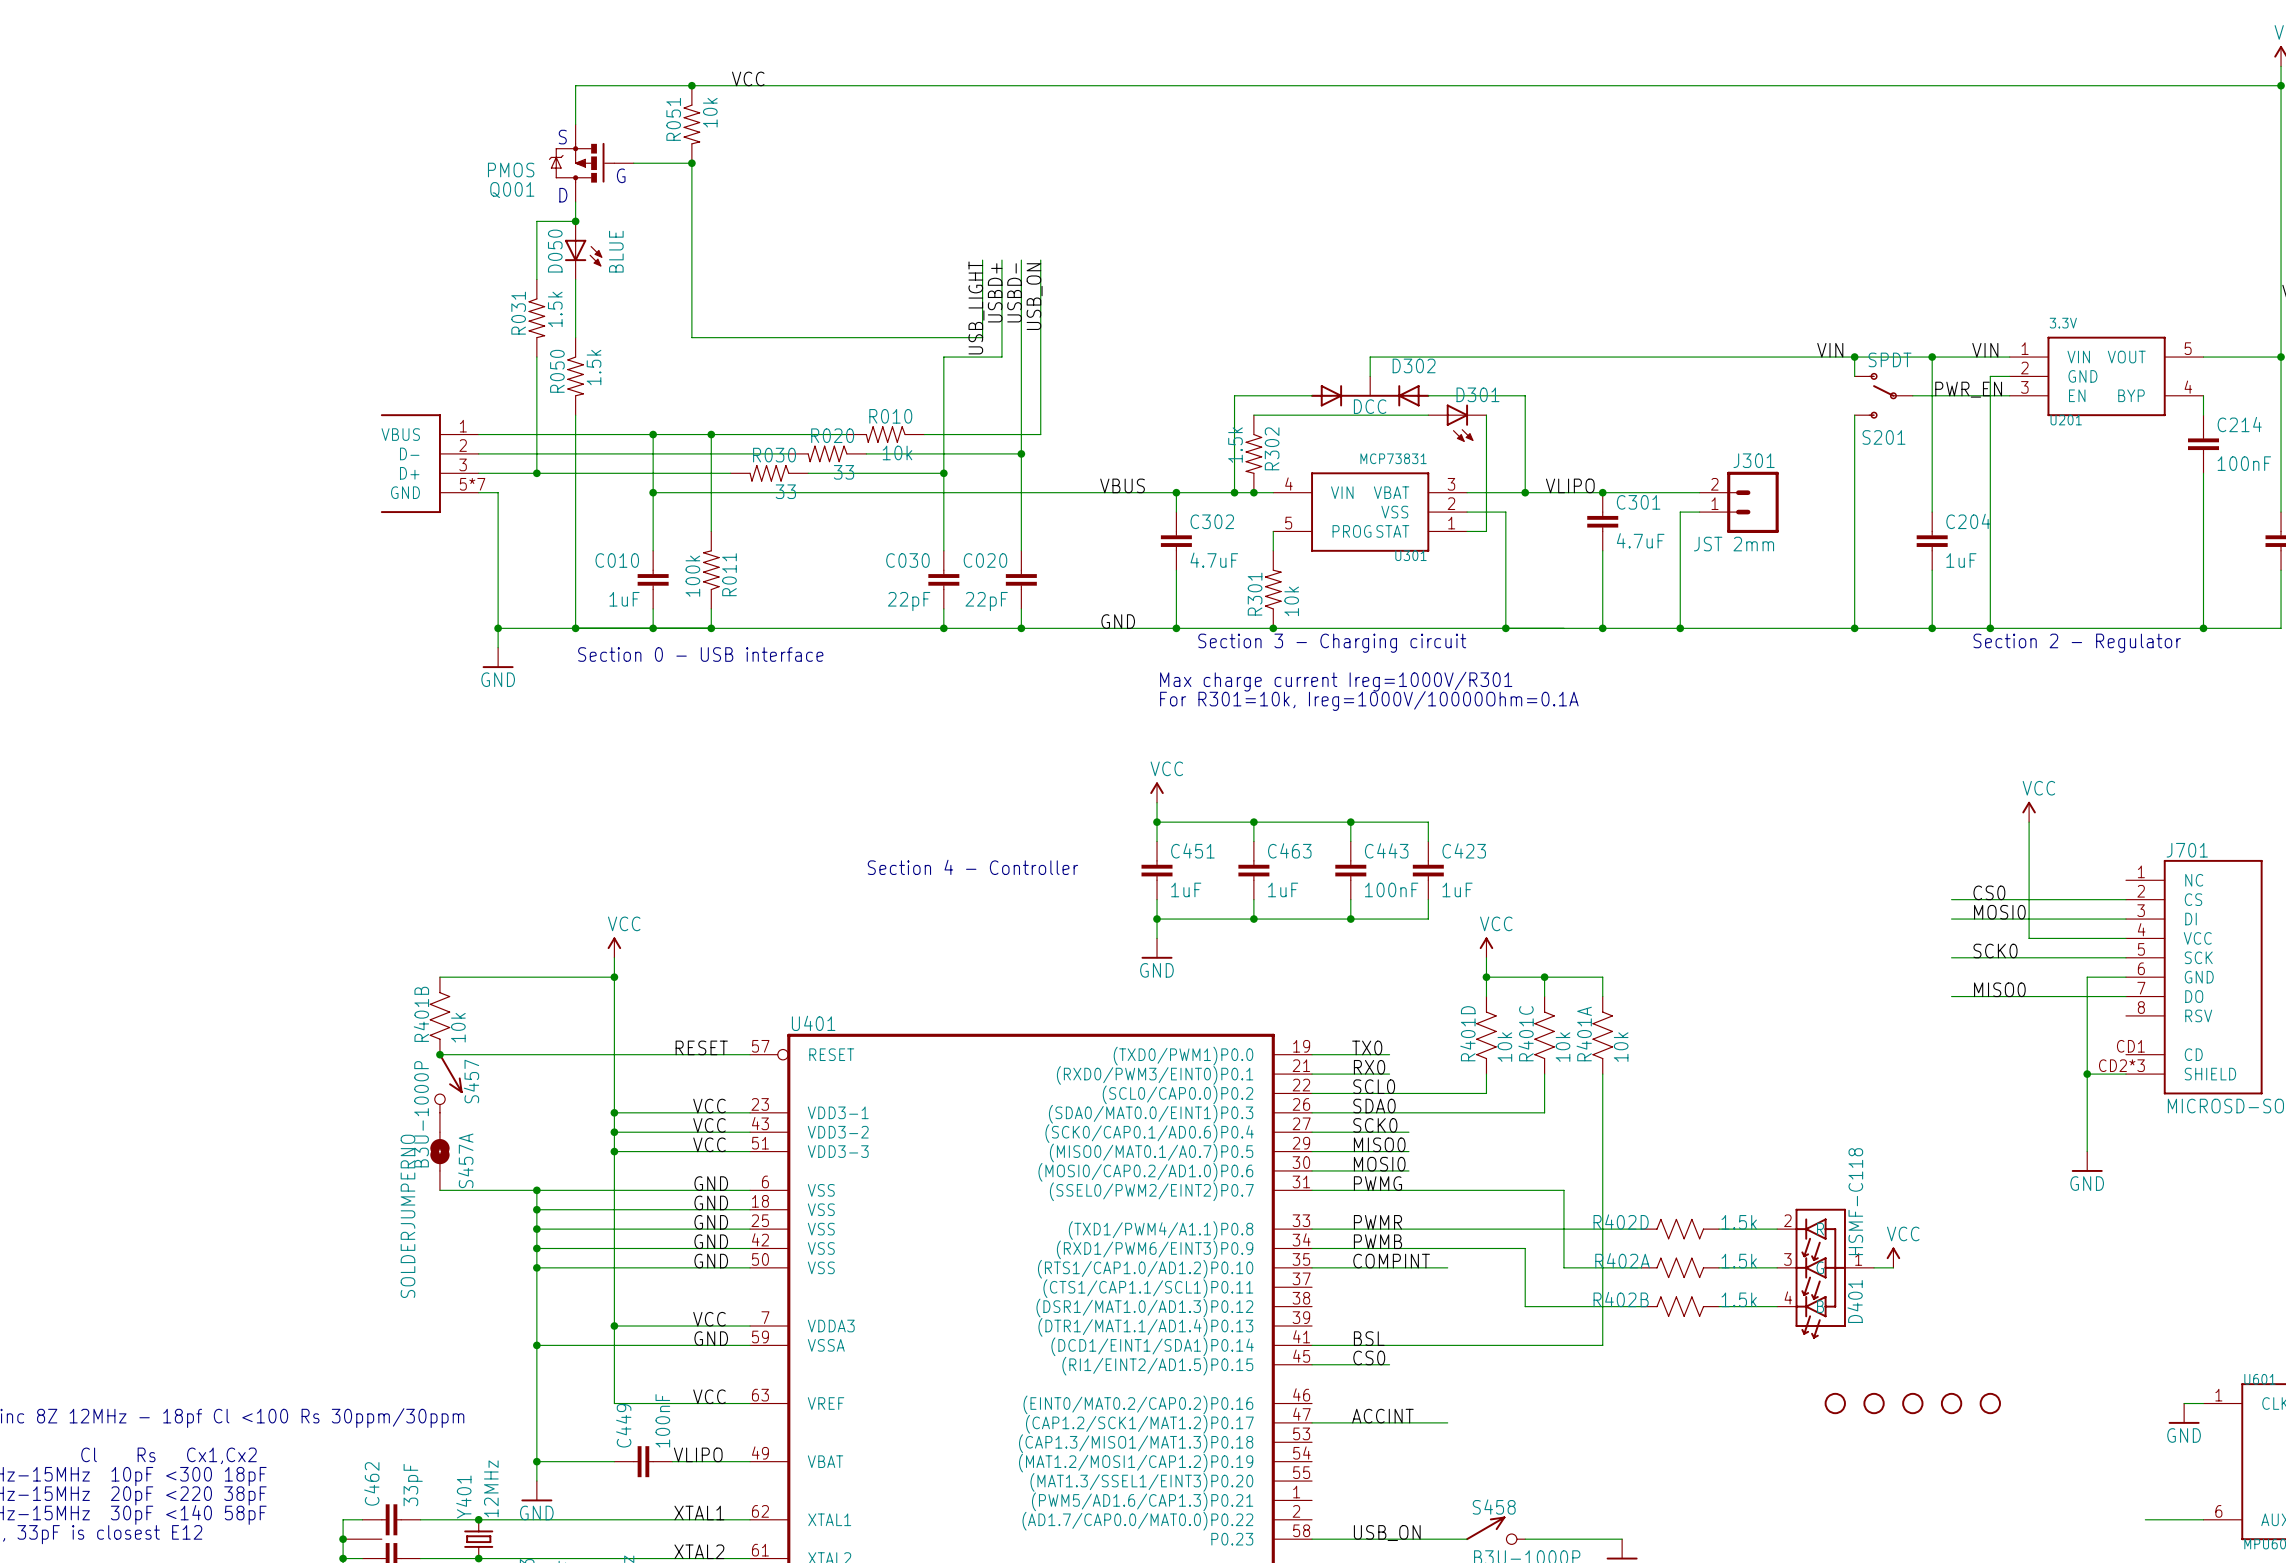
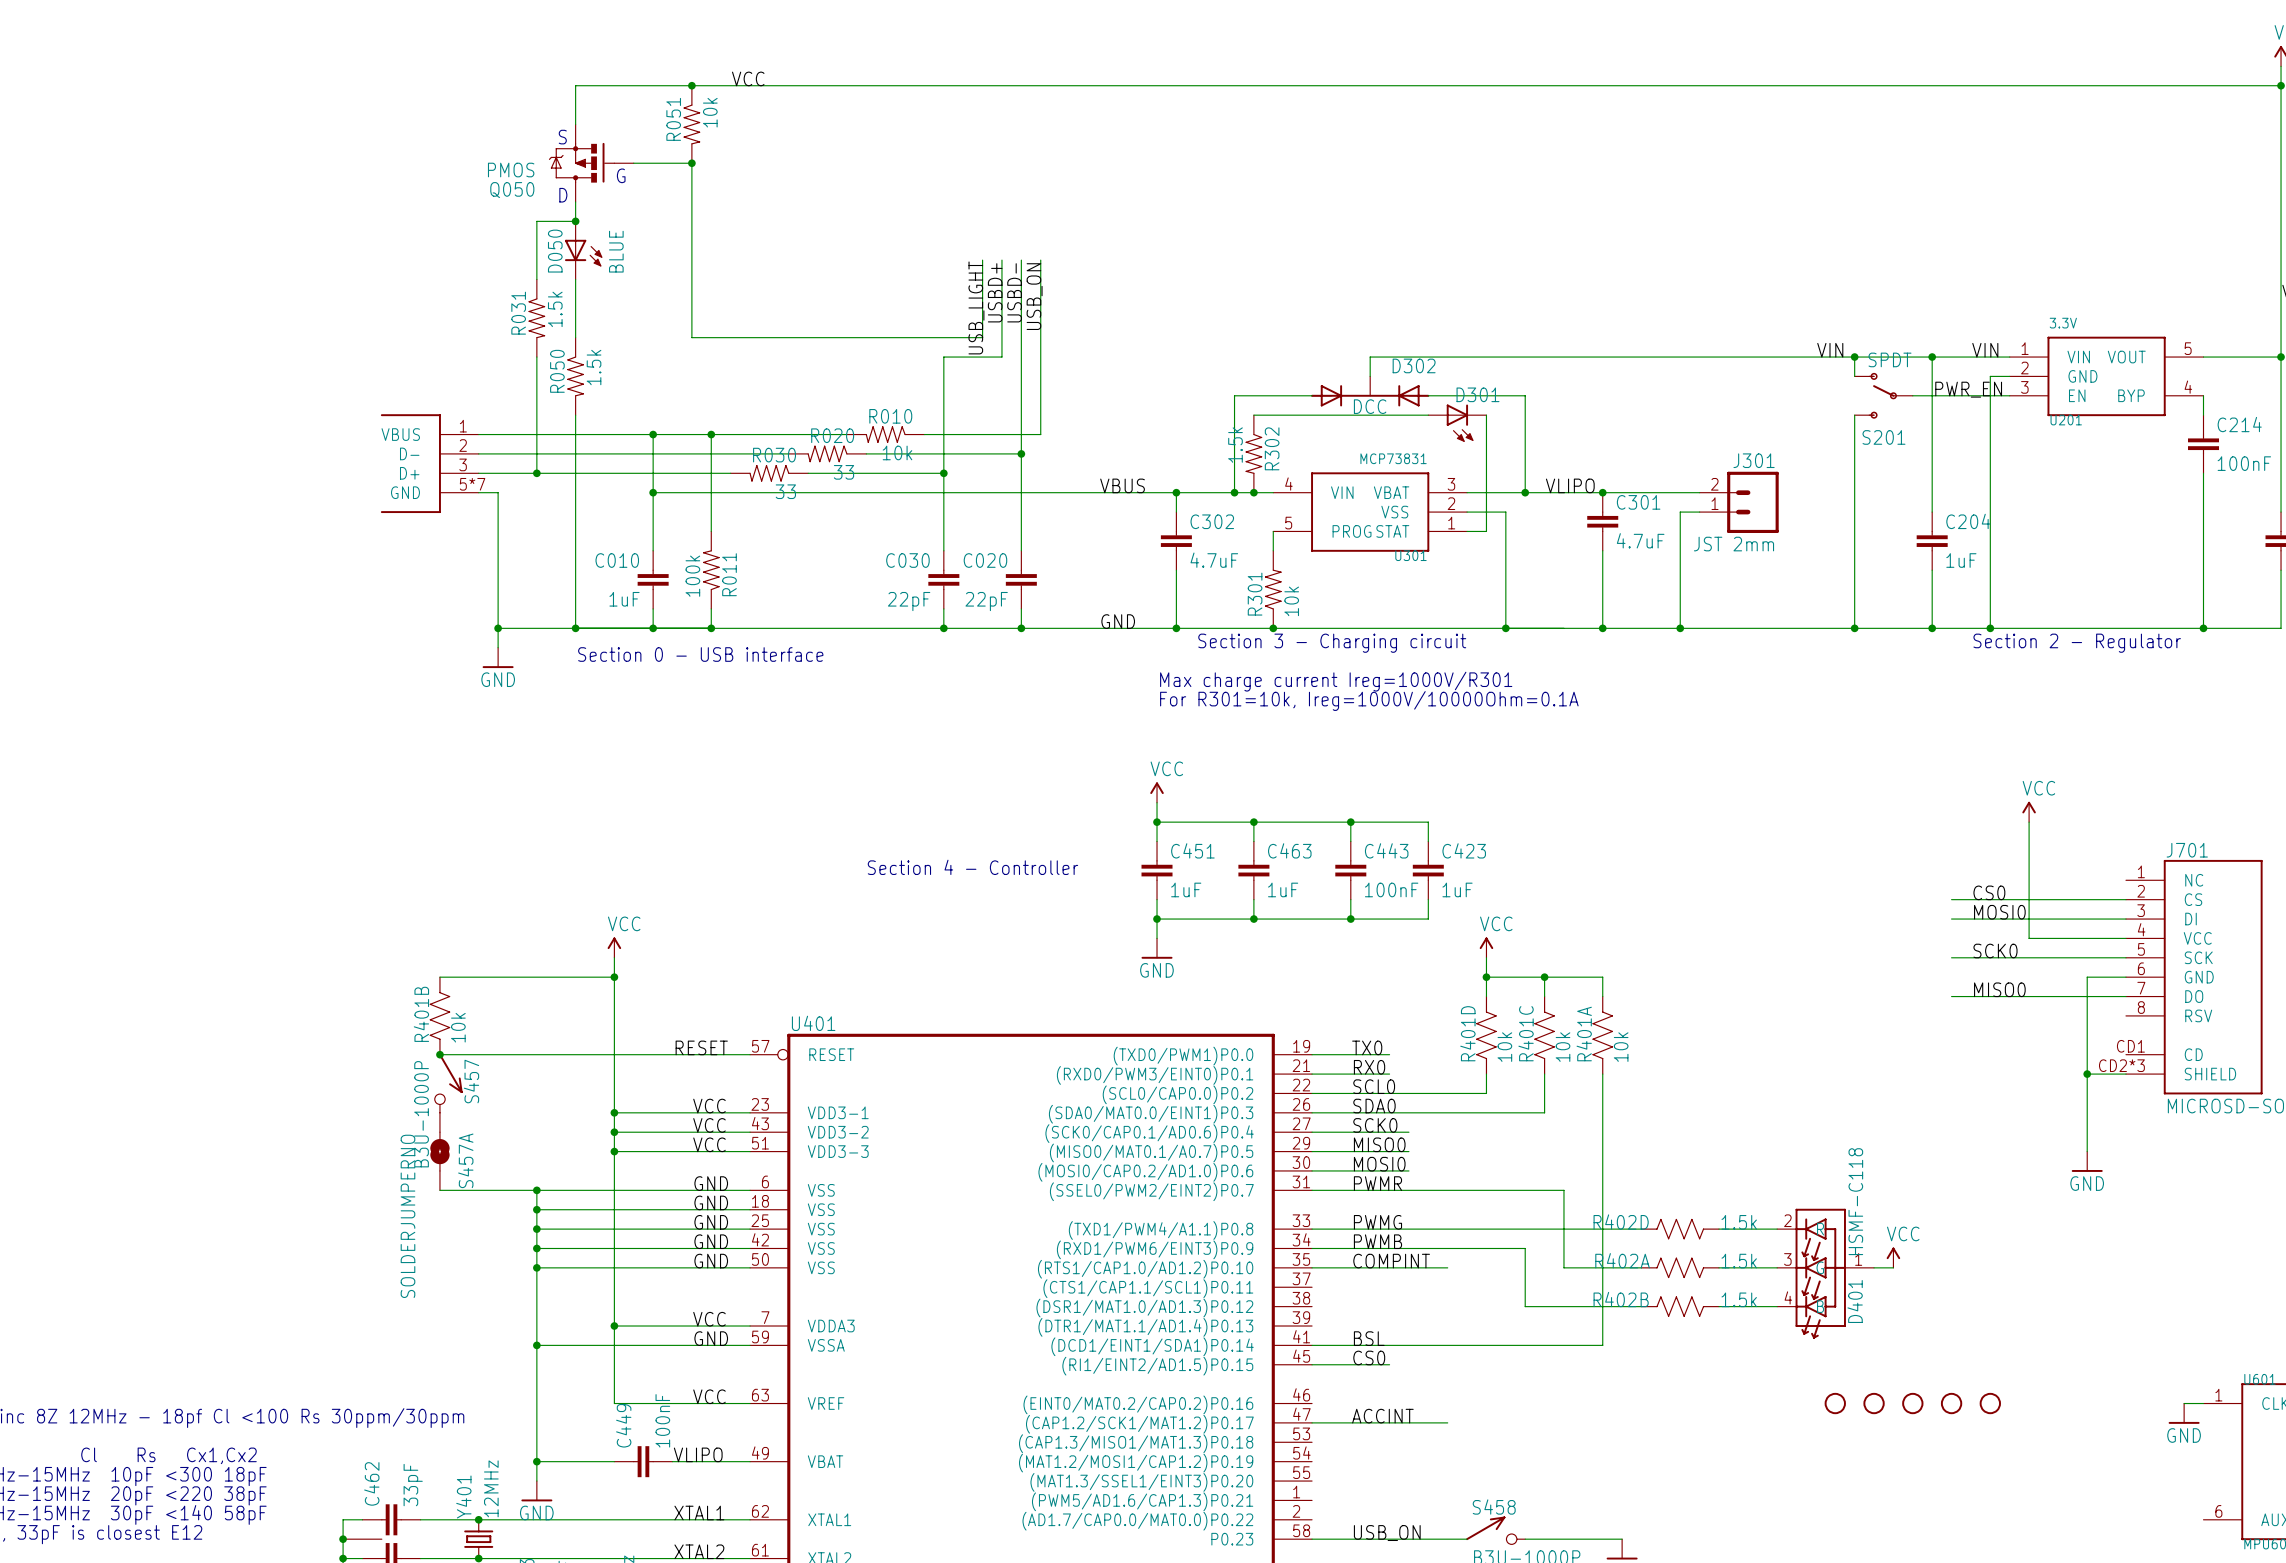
Q001 name: Q001 (512, 190) -> Q050 (512, 190)
label: PWMG (1377, 1183) -> PWMR (1377, 1183)
label: PWMR (1377, 1222) -> PWMG (1377, 1222)
wire: (2145, 1519) (2203, 1519) -> none

